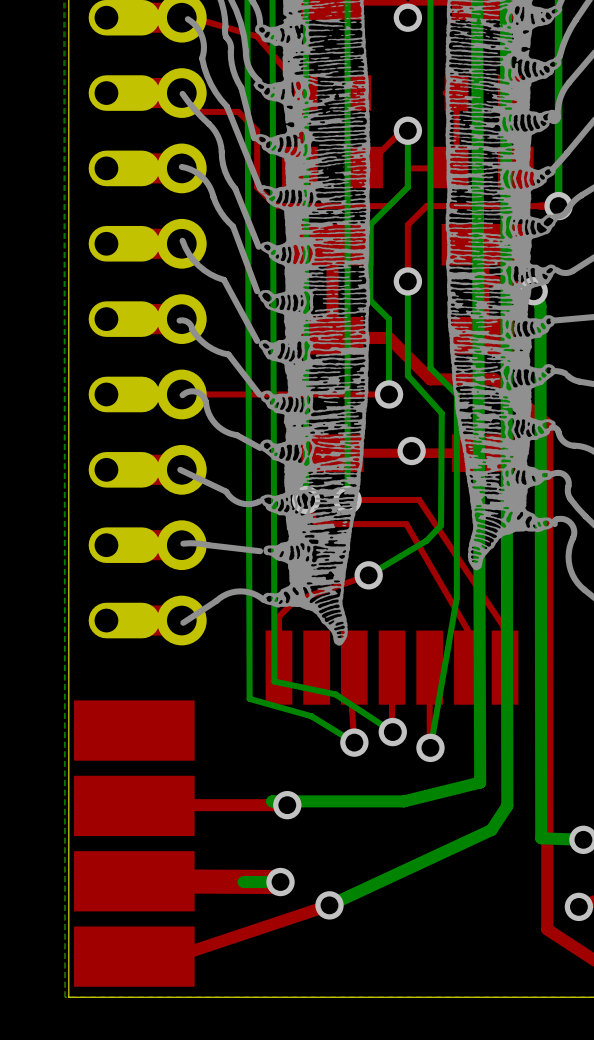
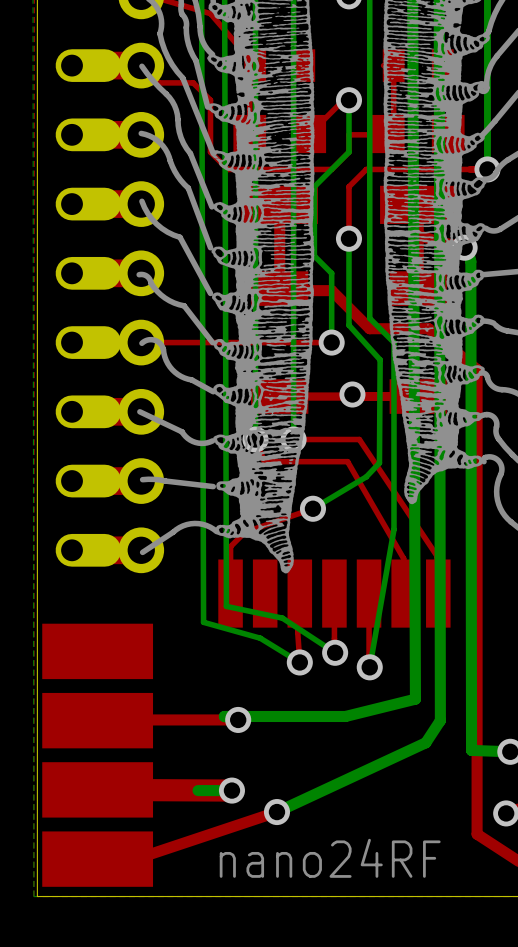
text: none -> nano24RF (330, 858)

